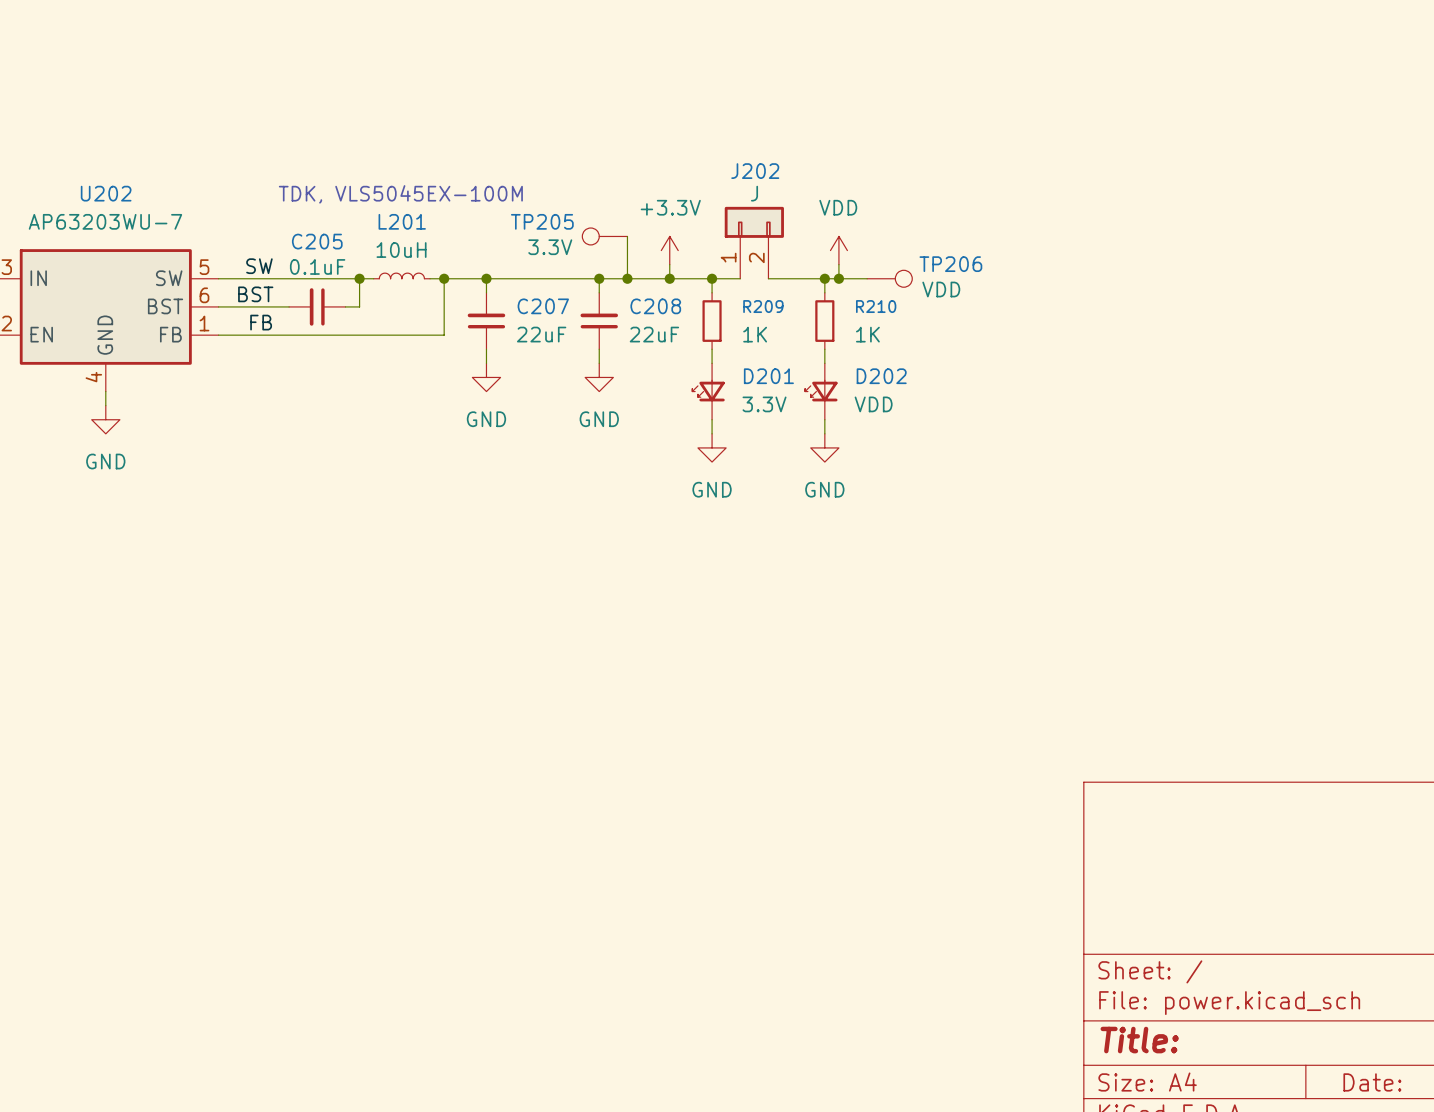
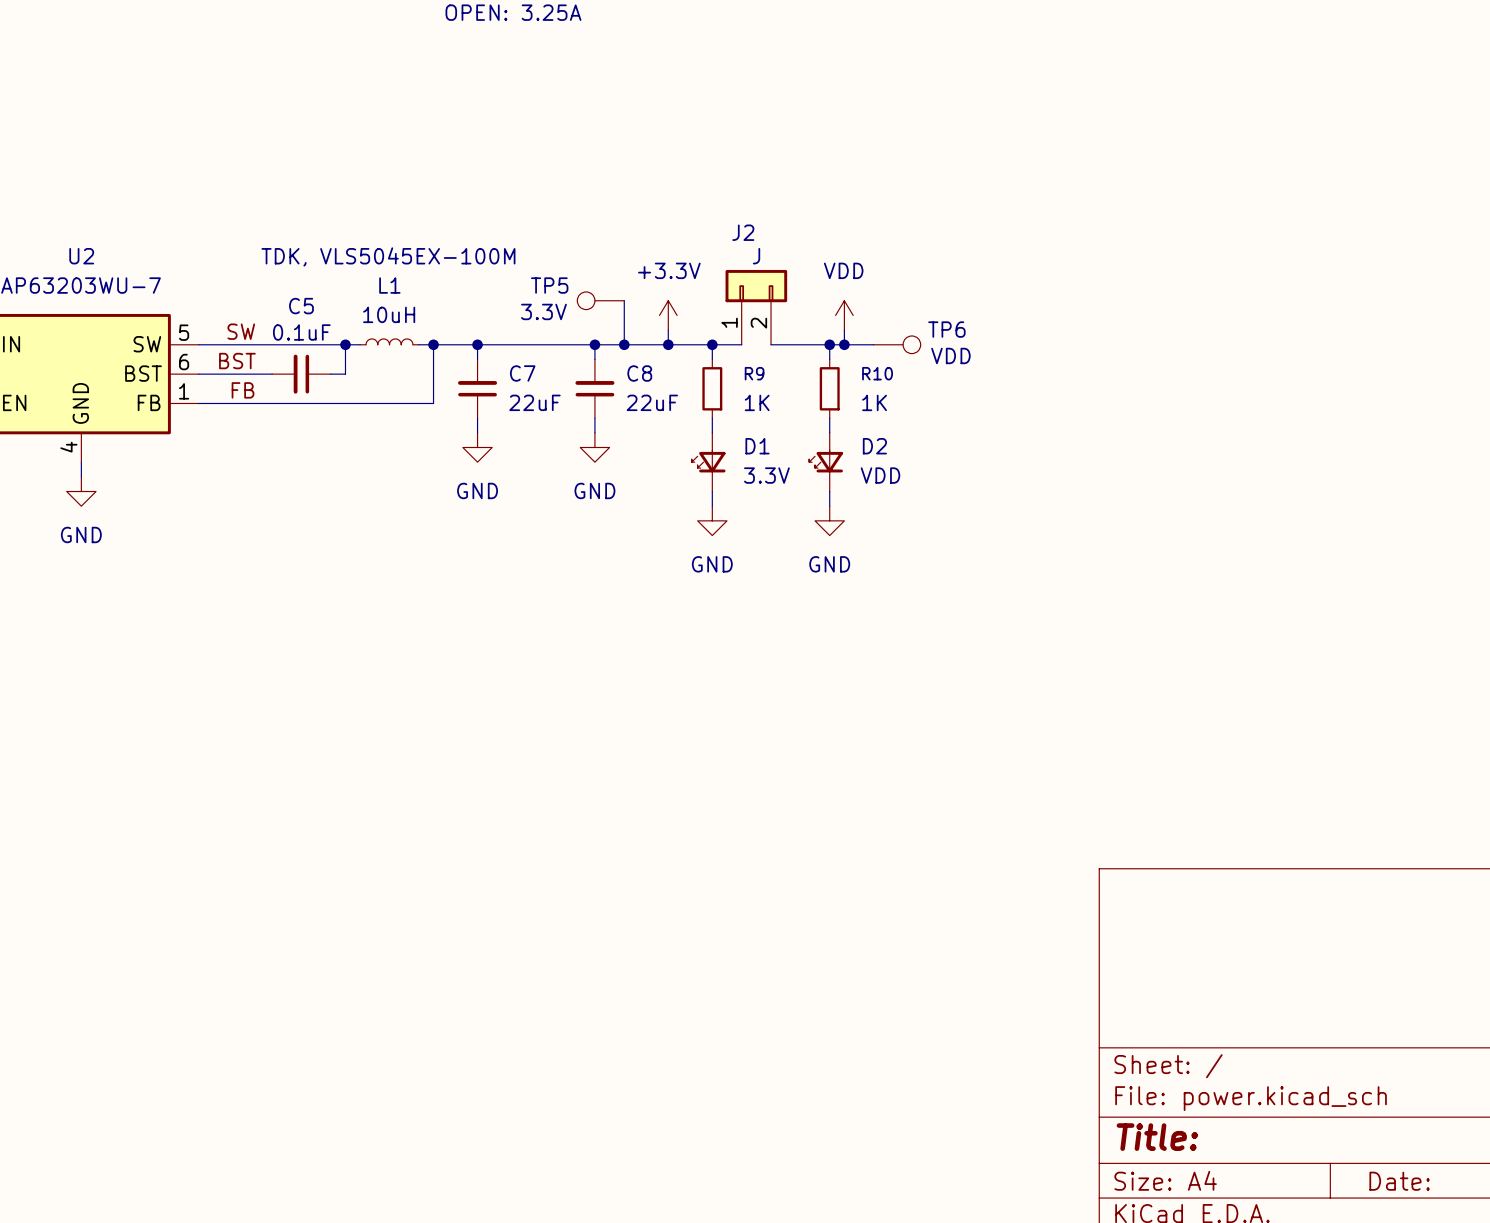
J202 name: J202 (755, 171) -> J2 (743, 232)
U202 name: U202 (106, 193) -> U2 (81, 256)
L201 name: L201 (402, 221) -> L1 (389, 285)
TP205 name: TP205 (542, 221) -> TP5 (549, 285)
C205 name: C205 (317, 241) -> C5 (301, 306)
TP206 name: TP206 (950, 264) -> TP6 (946, 329)
C207 name: C207 (543, 306) -> C7 (522, 373)
C208 name: C208 (655, 306) -> C8 (639, 373)
R209 name: R209 (763, 306) -> R9 (754, 373)
R210 name: R210 (876, 306) -> R10 (877, 373)
D201 name: D201 (768, 376) -> D1 (757, 446)
D202 name: D202 (881, 376) -> D2 (874, 446)

